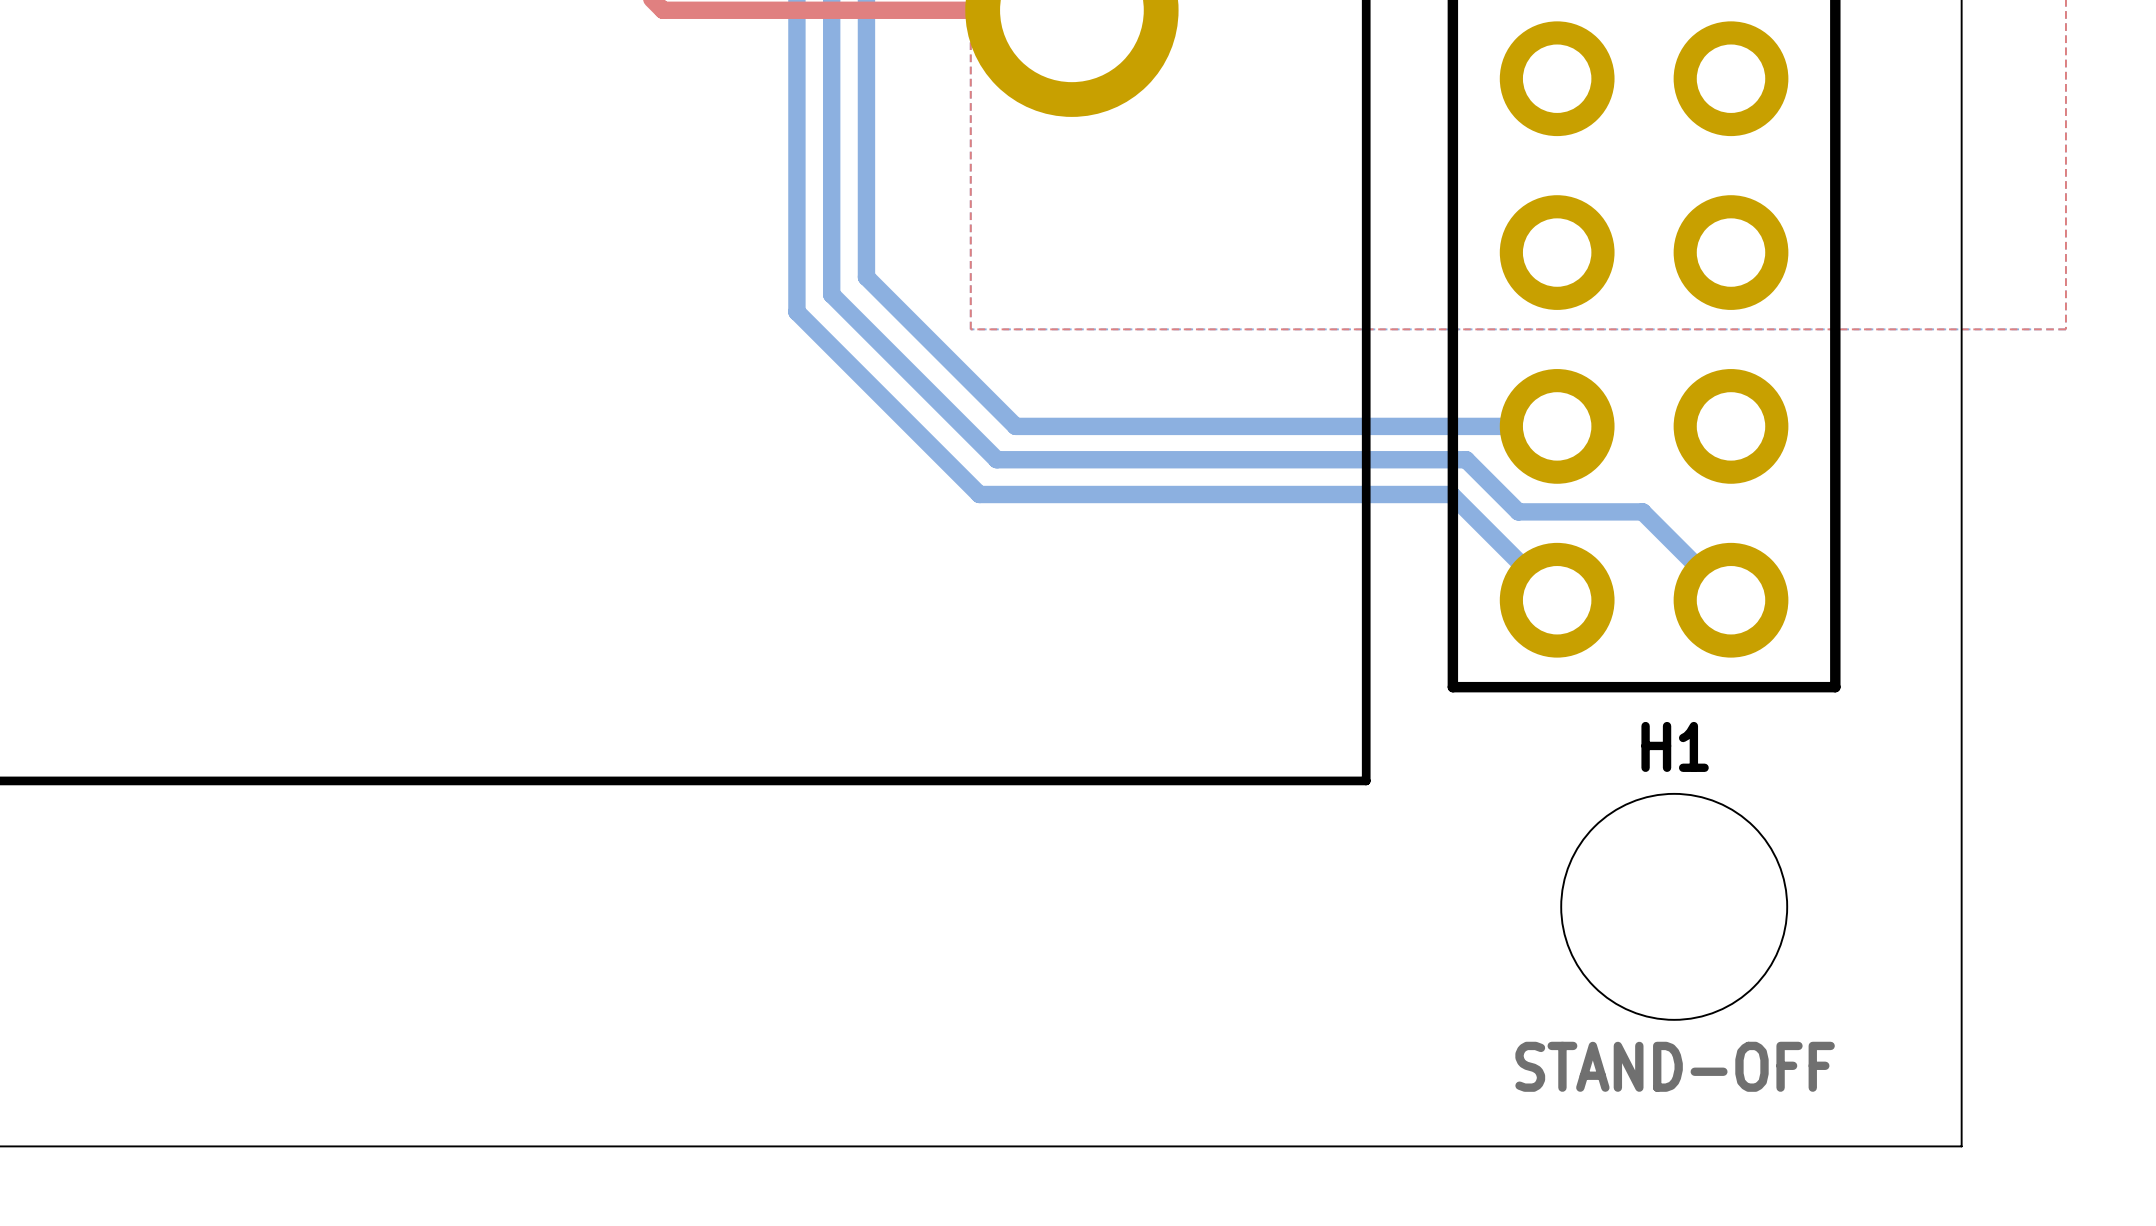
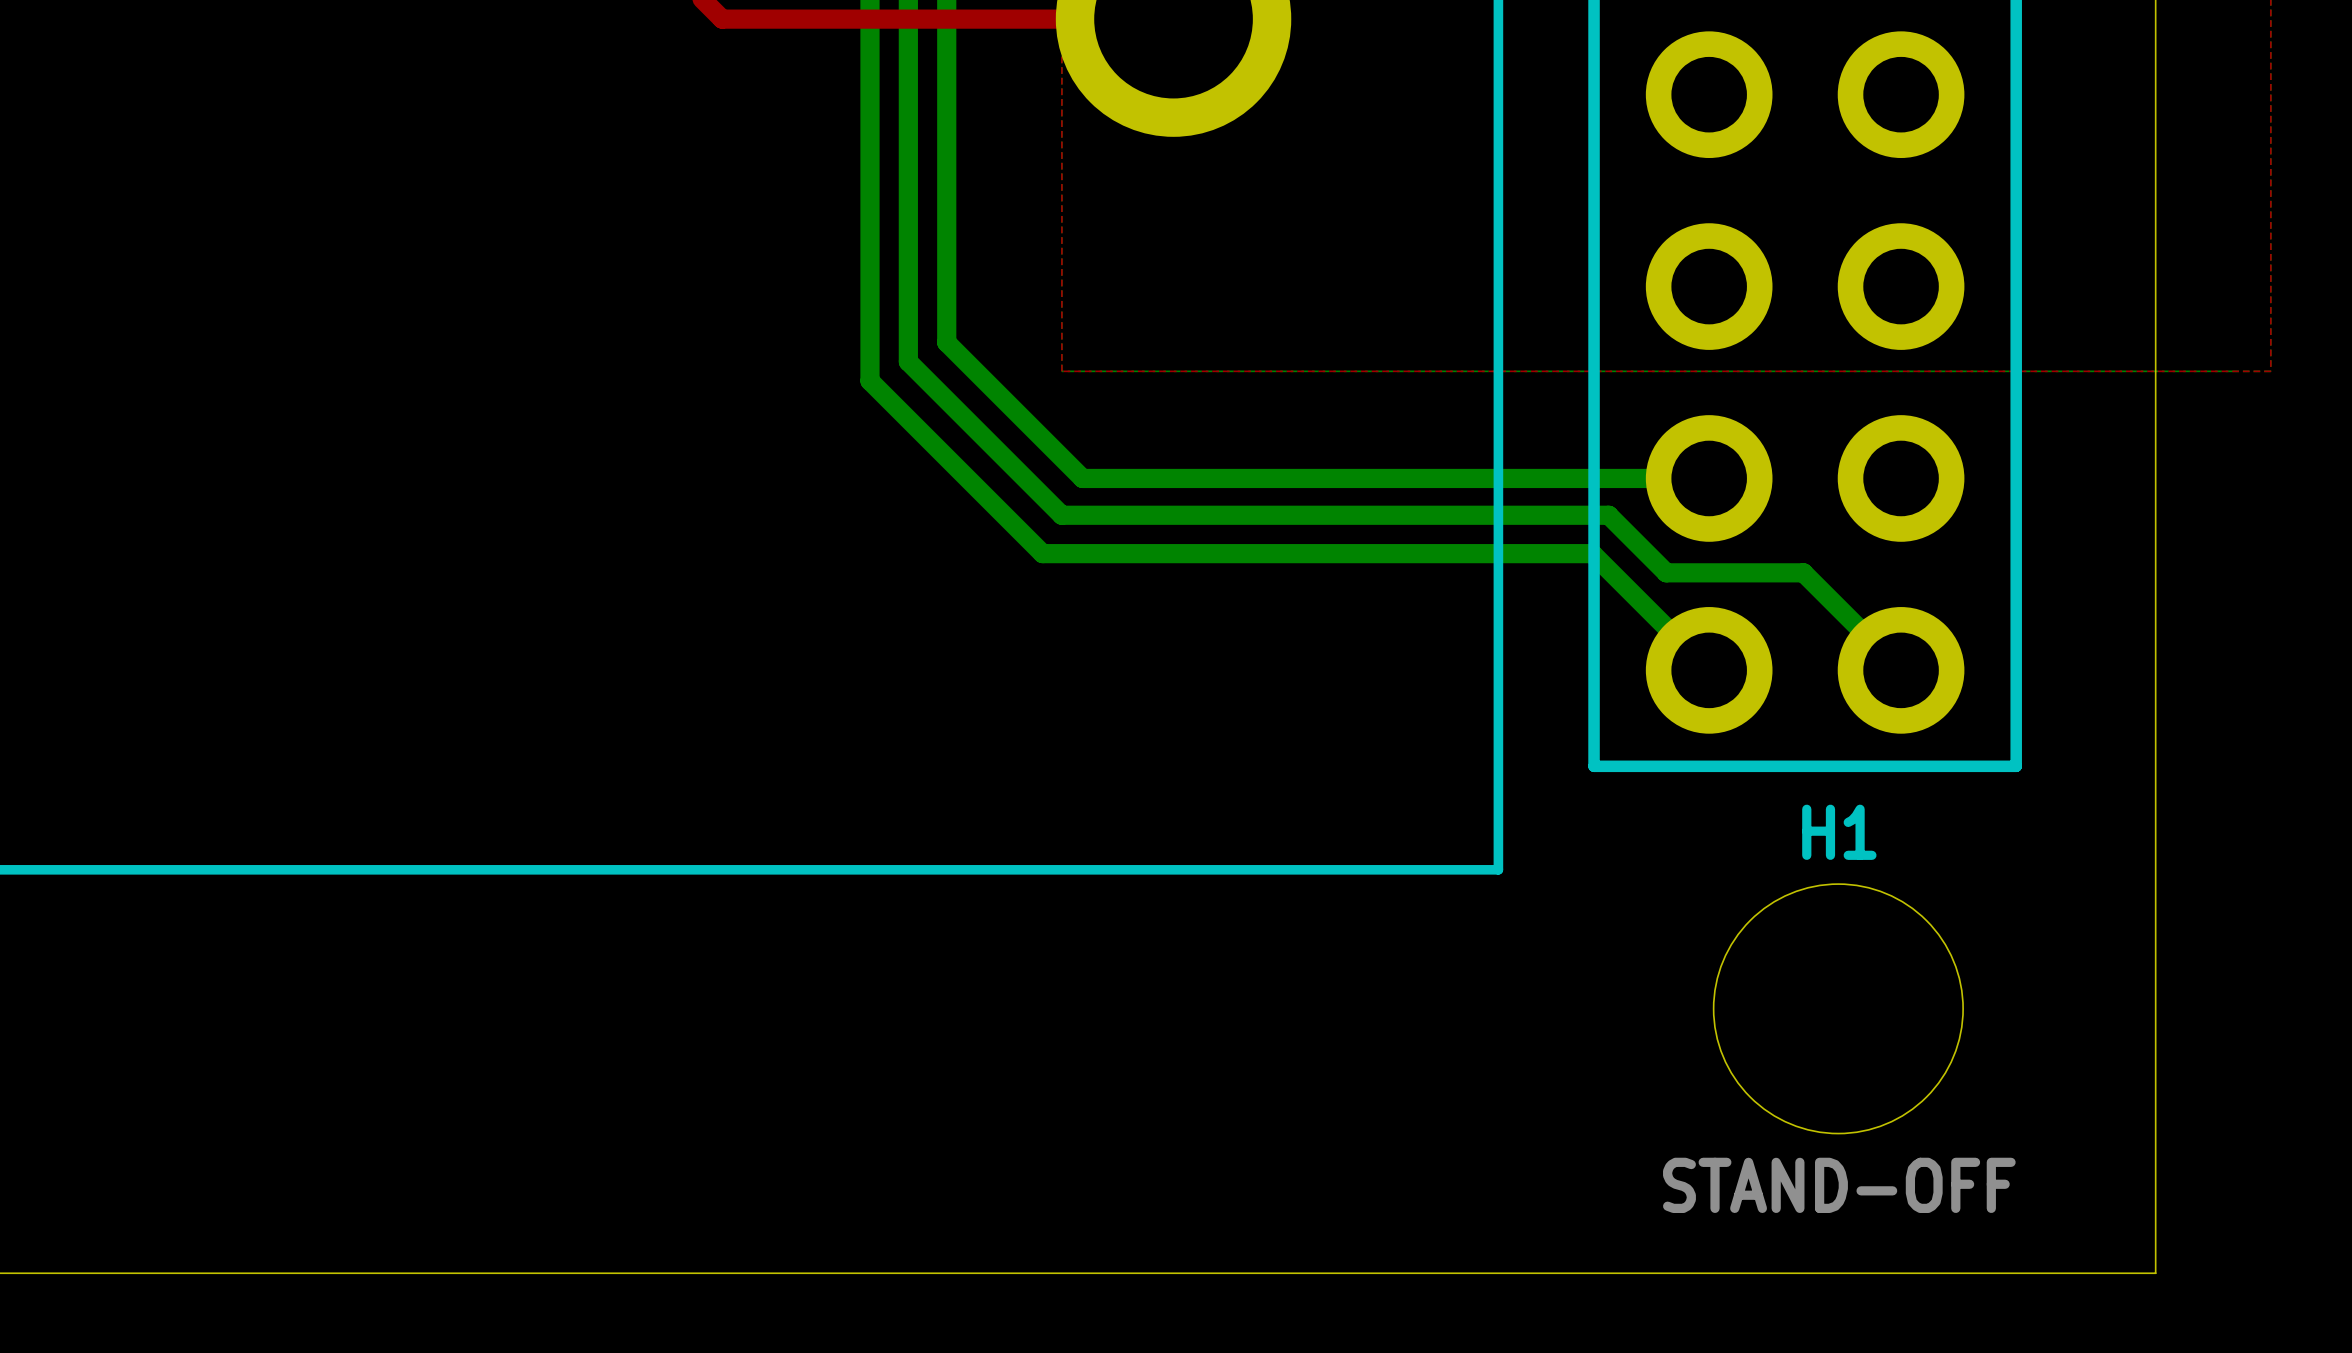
bottom track: (866, 277) (1015, 426) -> (946, 313) (946, 342) (1082, 478) (1111, 478)
bottom track: (831, 294) (996, 459) -> (908, 332) (908, 361) (1061, 515) (1090, 515)
bottom track: (796, 311) (979, 494) -> (869, 352) (869, 380) (1042, 553) (1071, 553)

